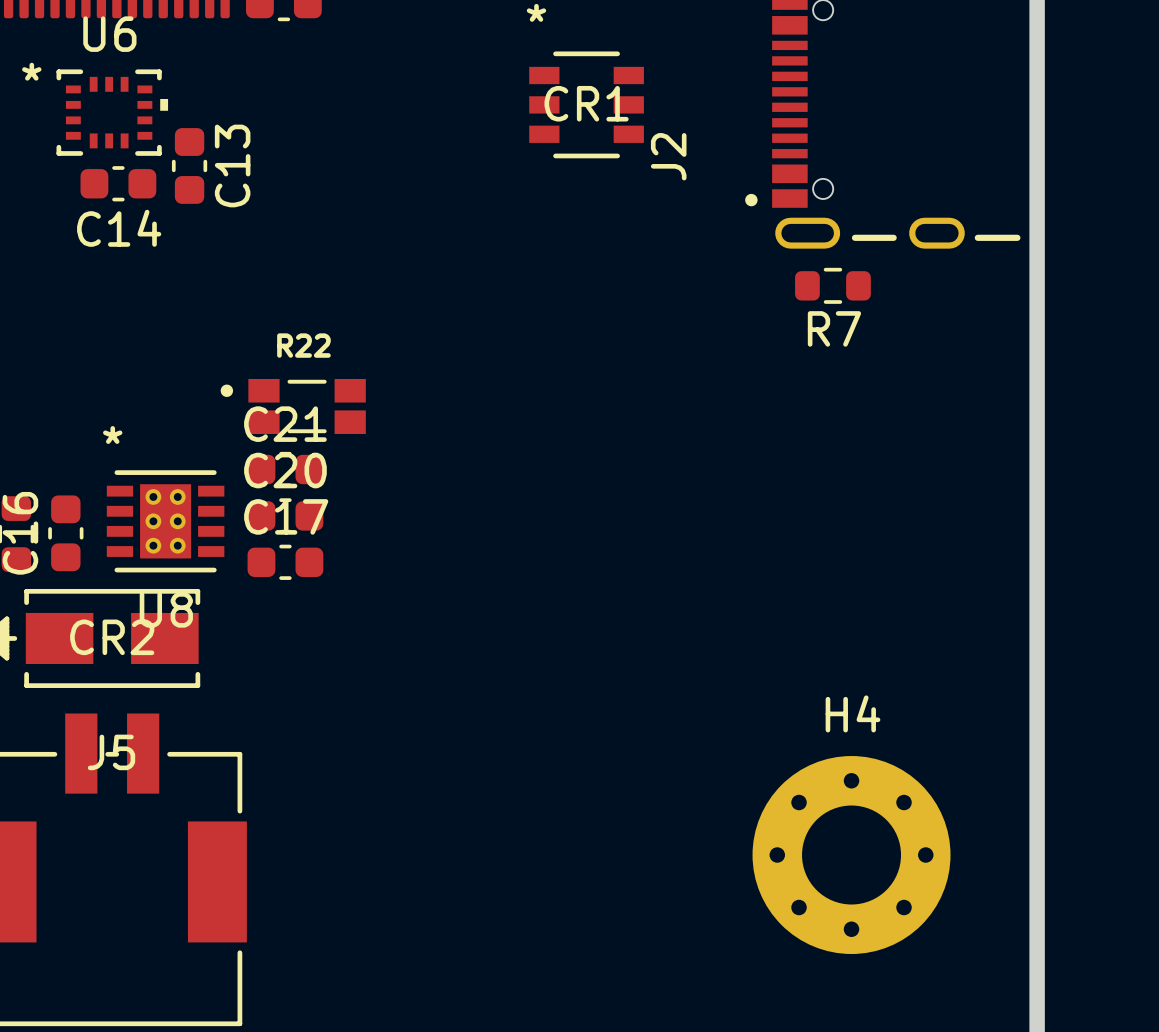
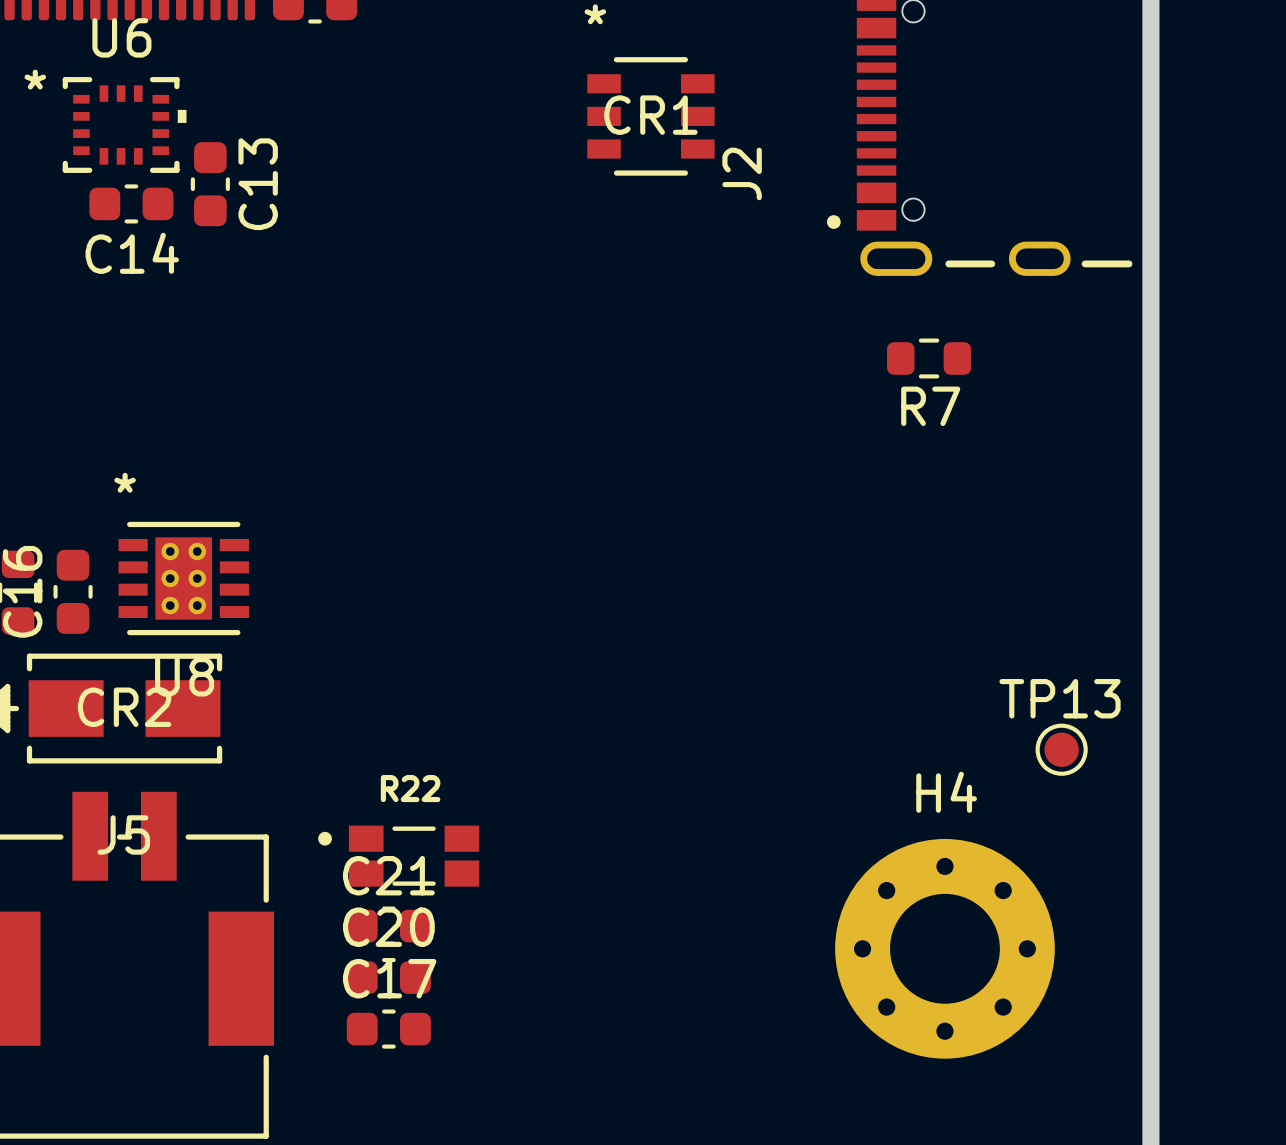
R7 position: (832, 285) -> (929, 358)
R22 position: (293, 406) -> (398, 856)
C21 position: (285, 469) -> (388, 926)
C20 position: (285, 515) -> (388, 977)
C17 position: (285, 562) -> (388, 1029)
TP13: none -> (1061, 749)

